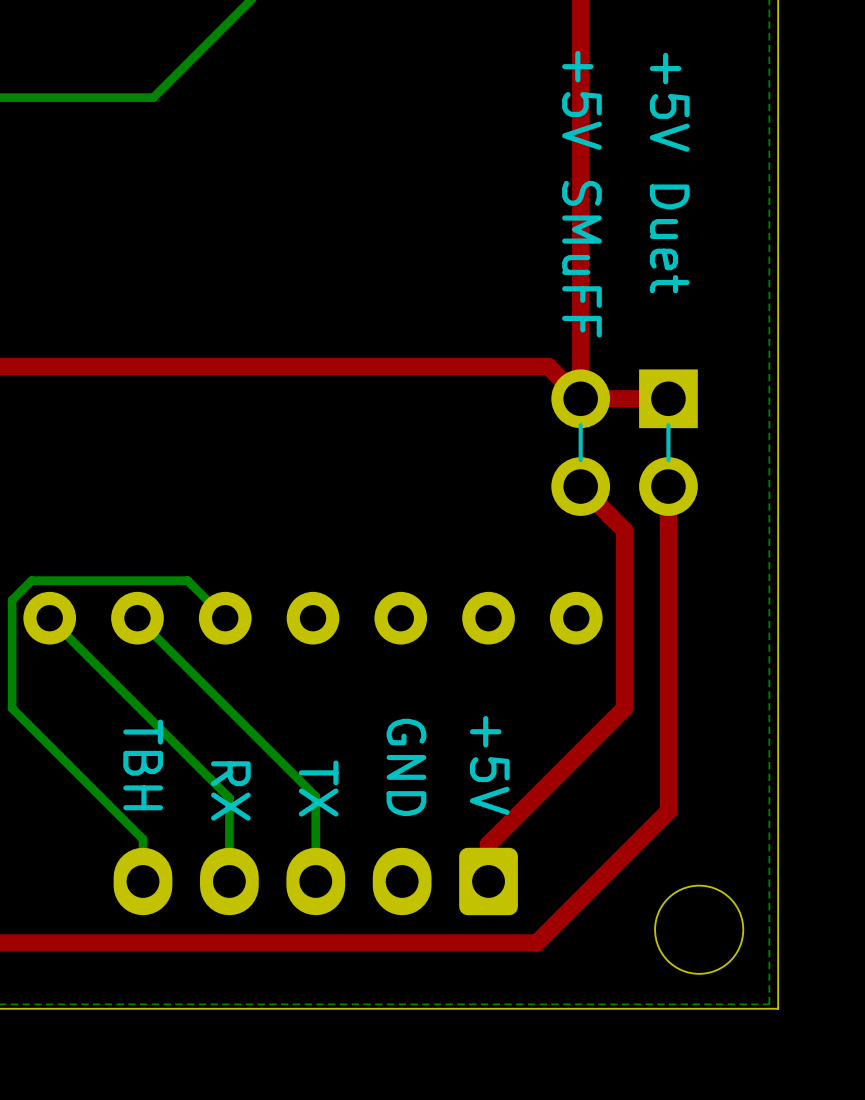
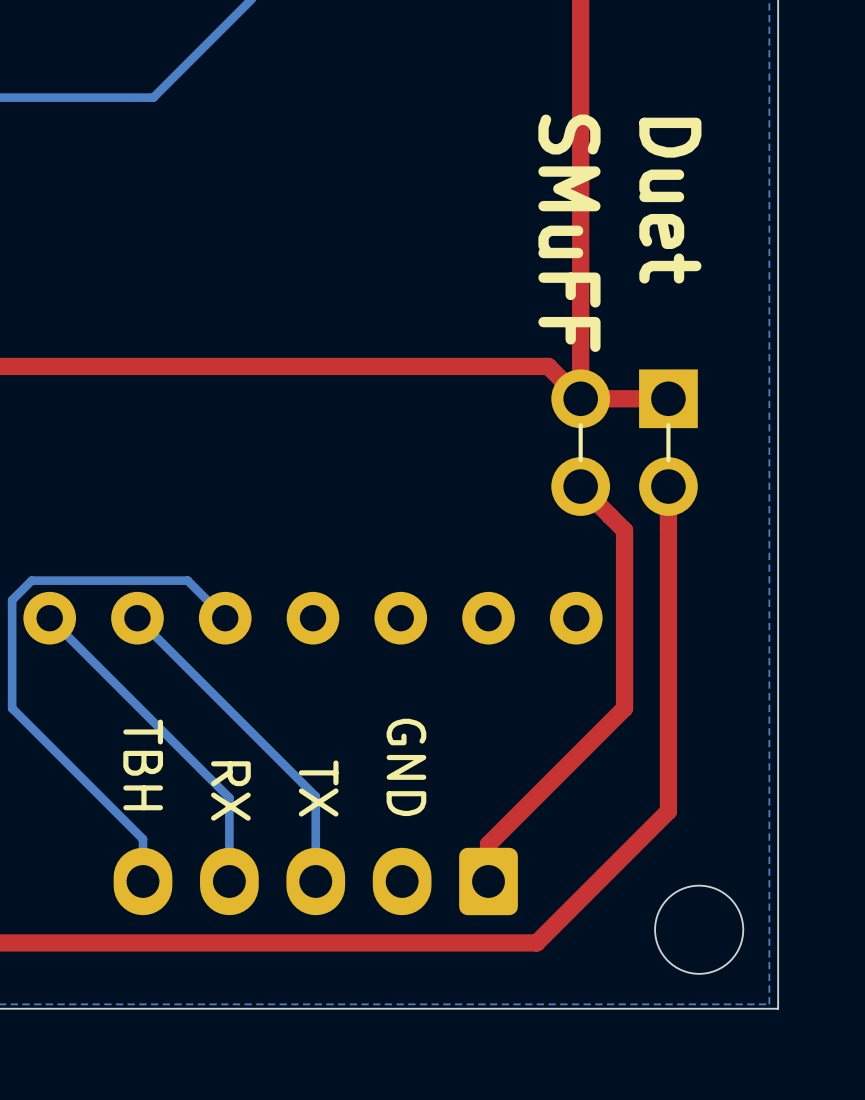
text: +5V Duet (669, 173) -> Duet (670, 200)
text: +5V SMuFF (581, 194) -> SMuFF (569, 233)
text: +5V (489, 765) -> none

